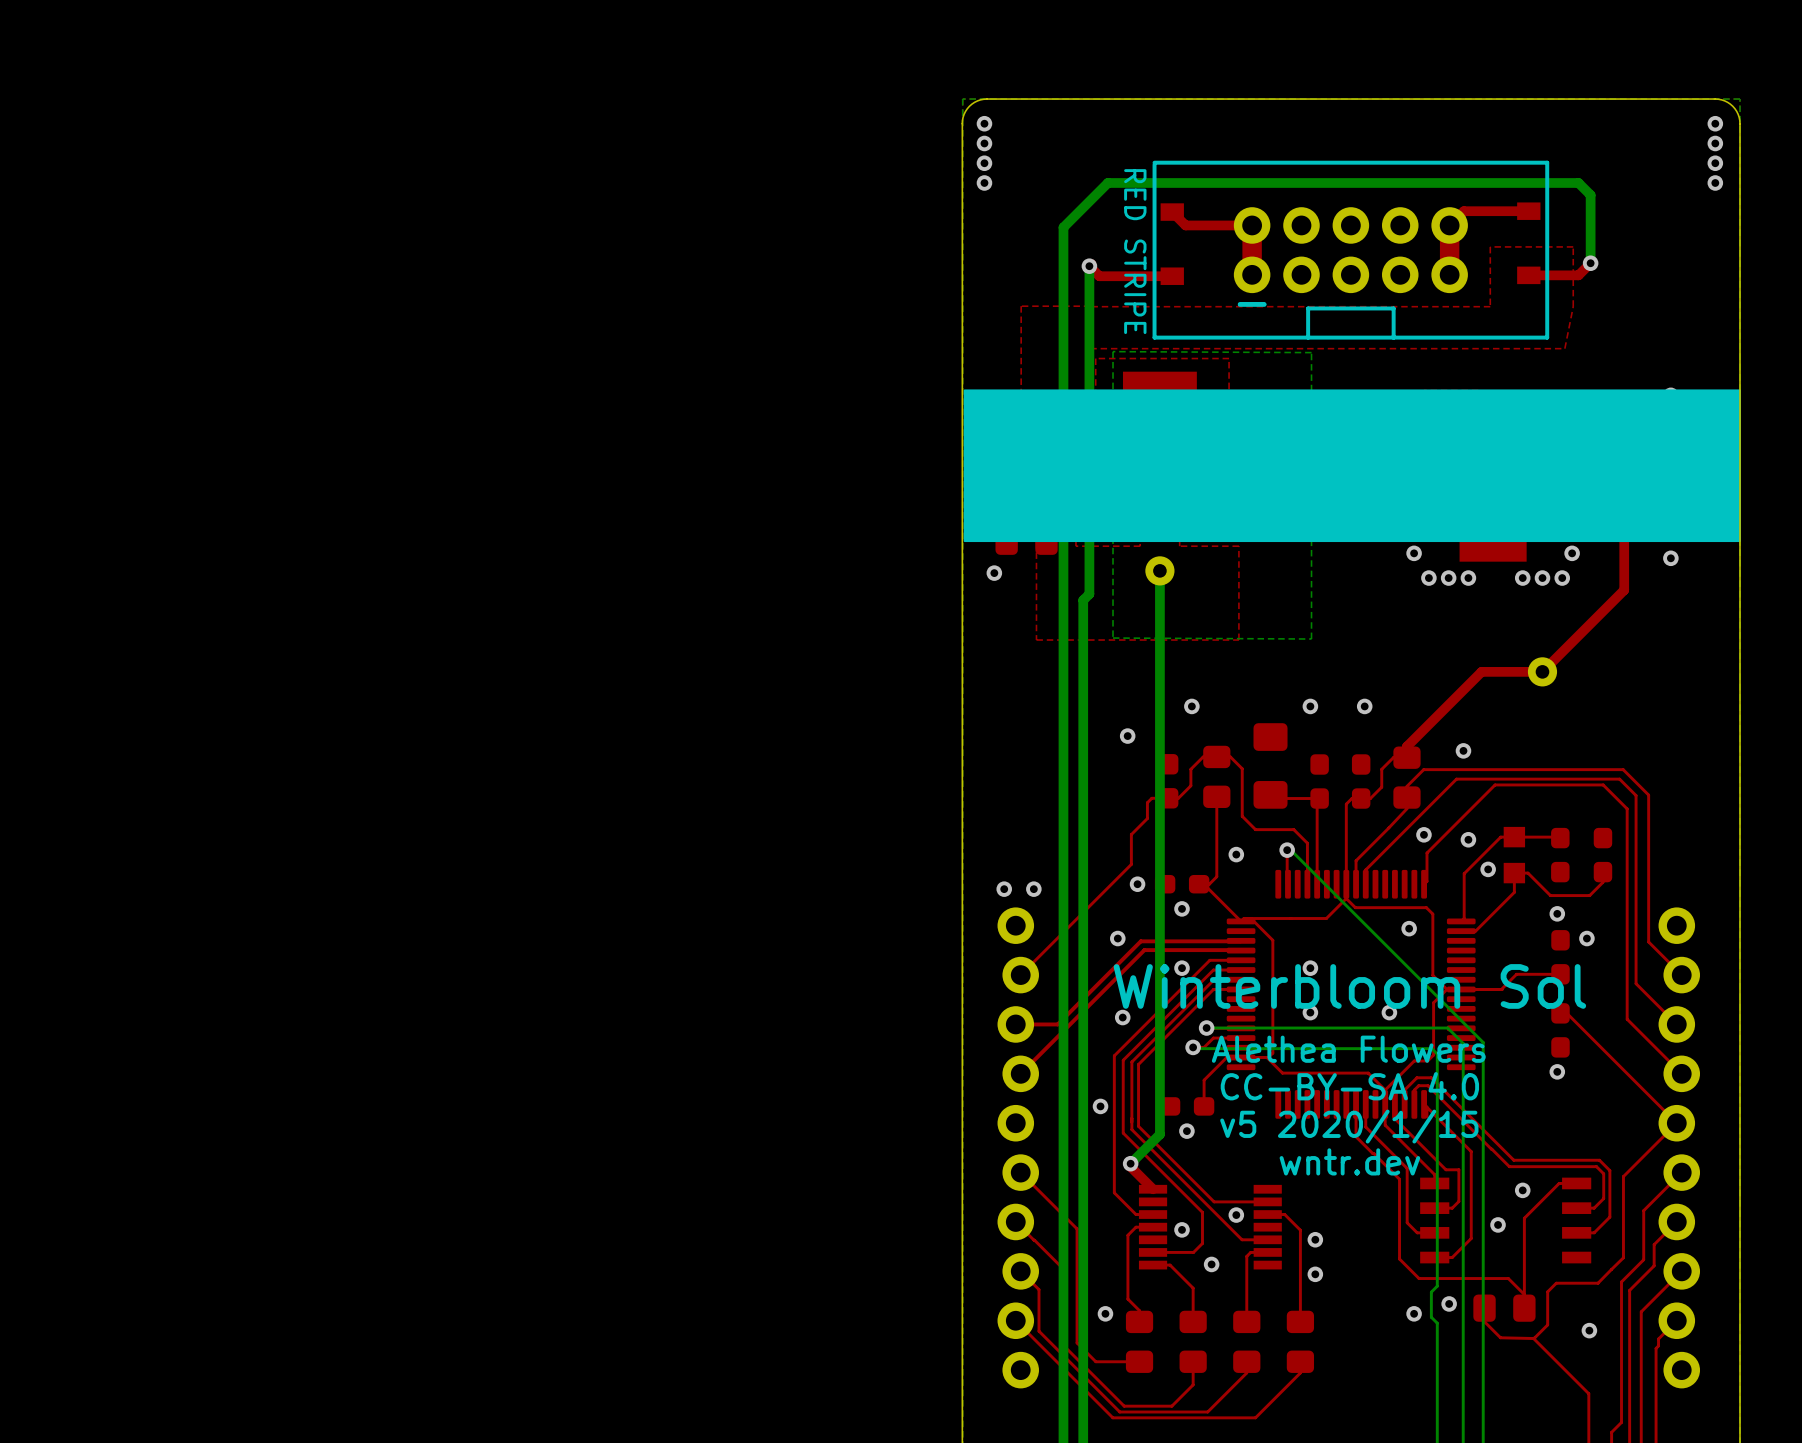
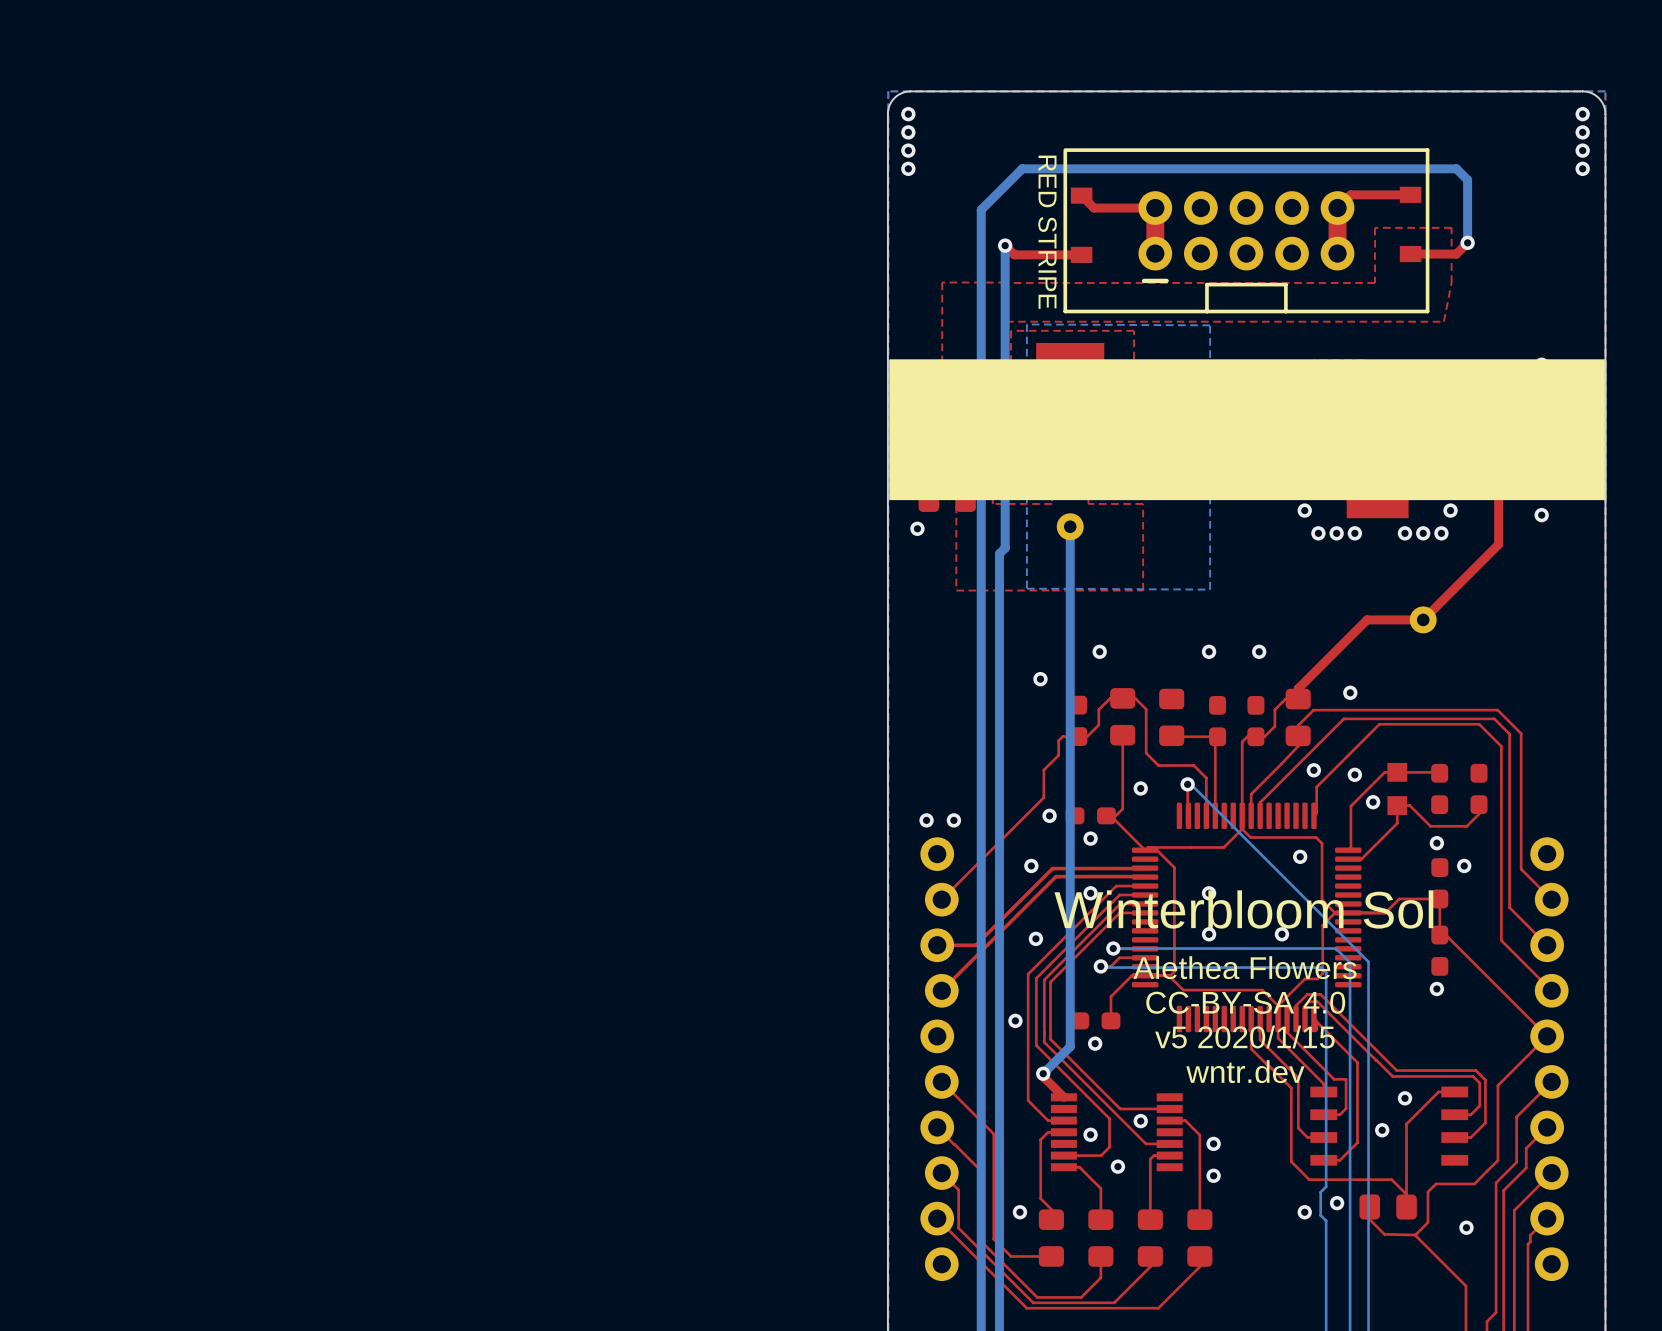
part footprint: [1253, 723, 1288, 809] -> [1159, 688, 1185, 747]

